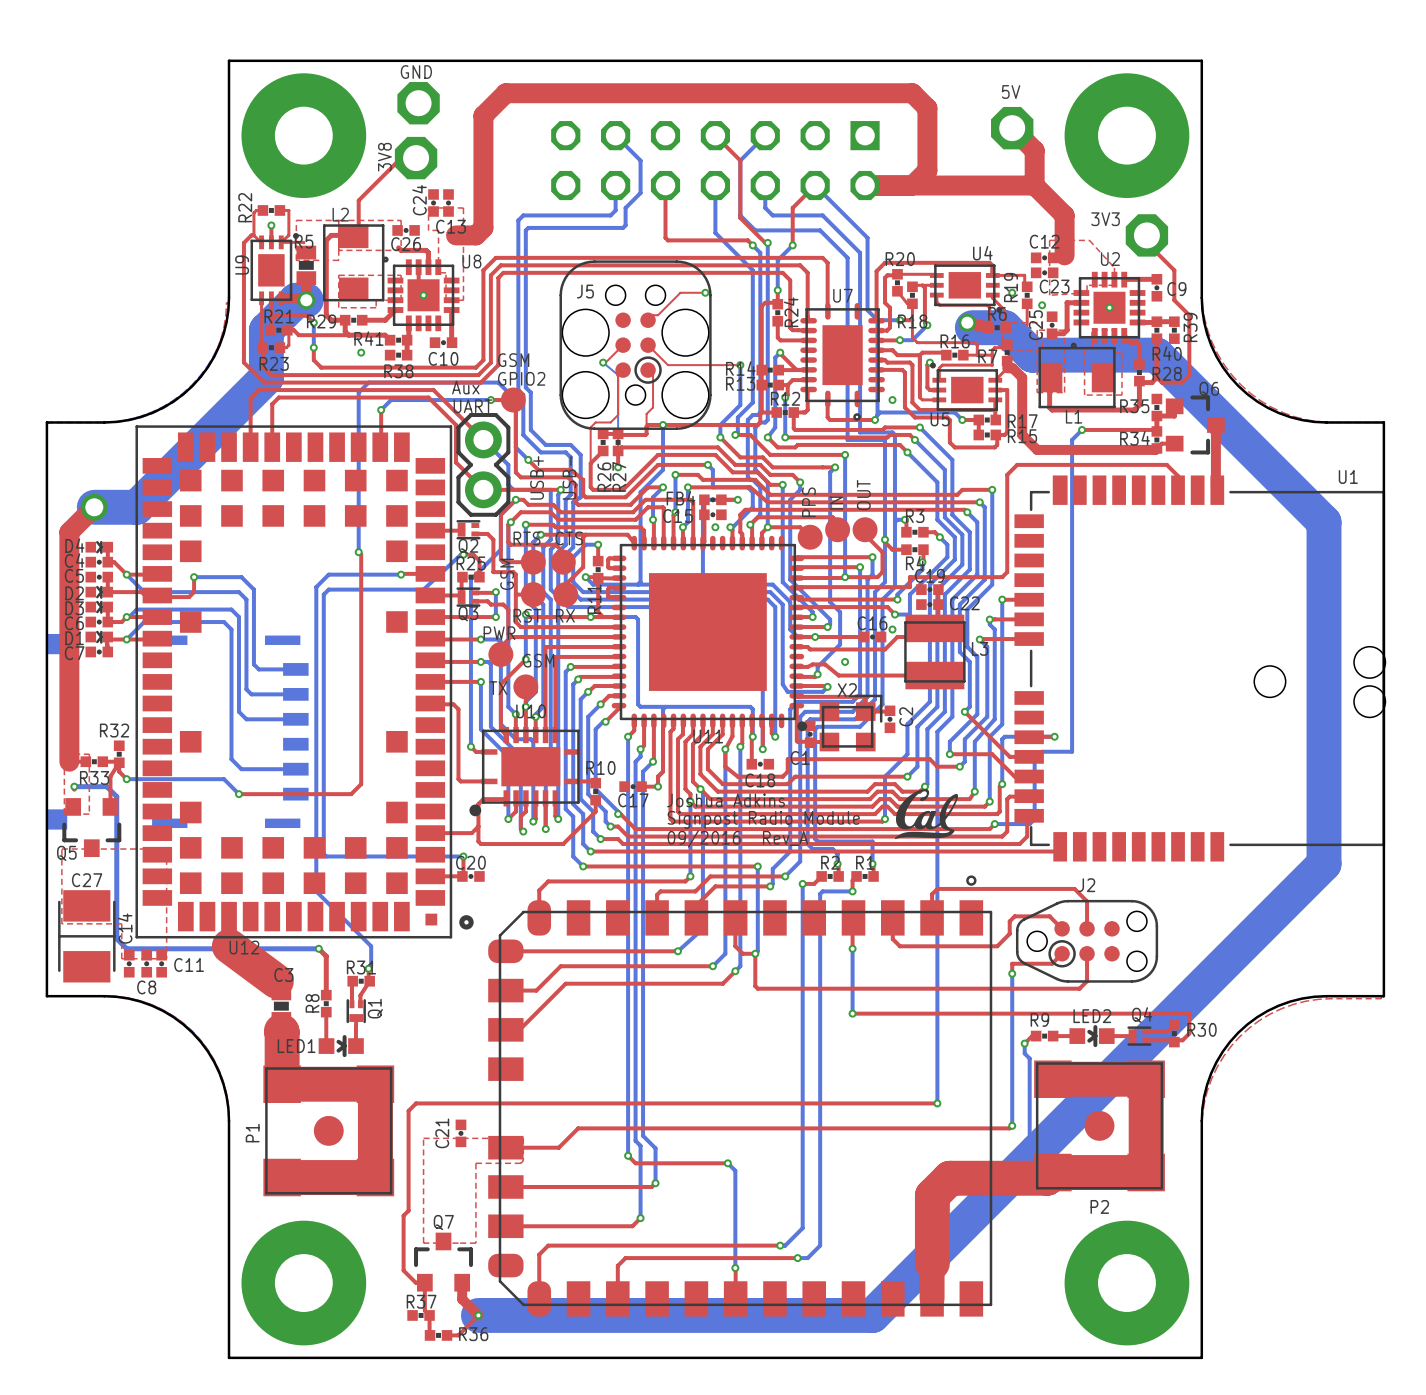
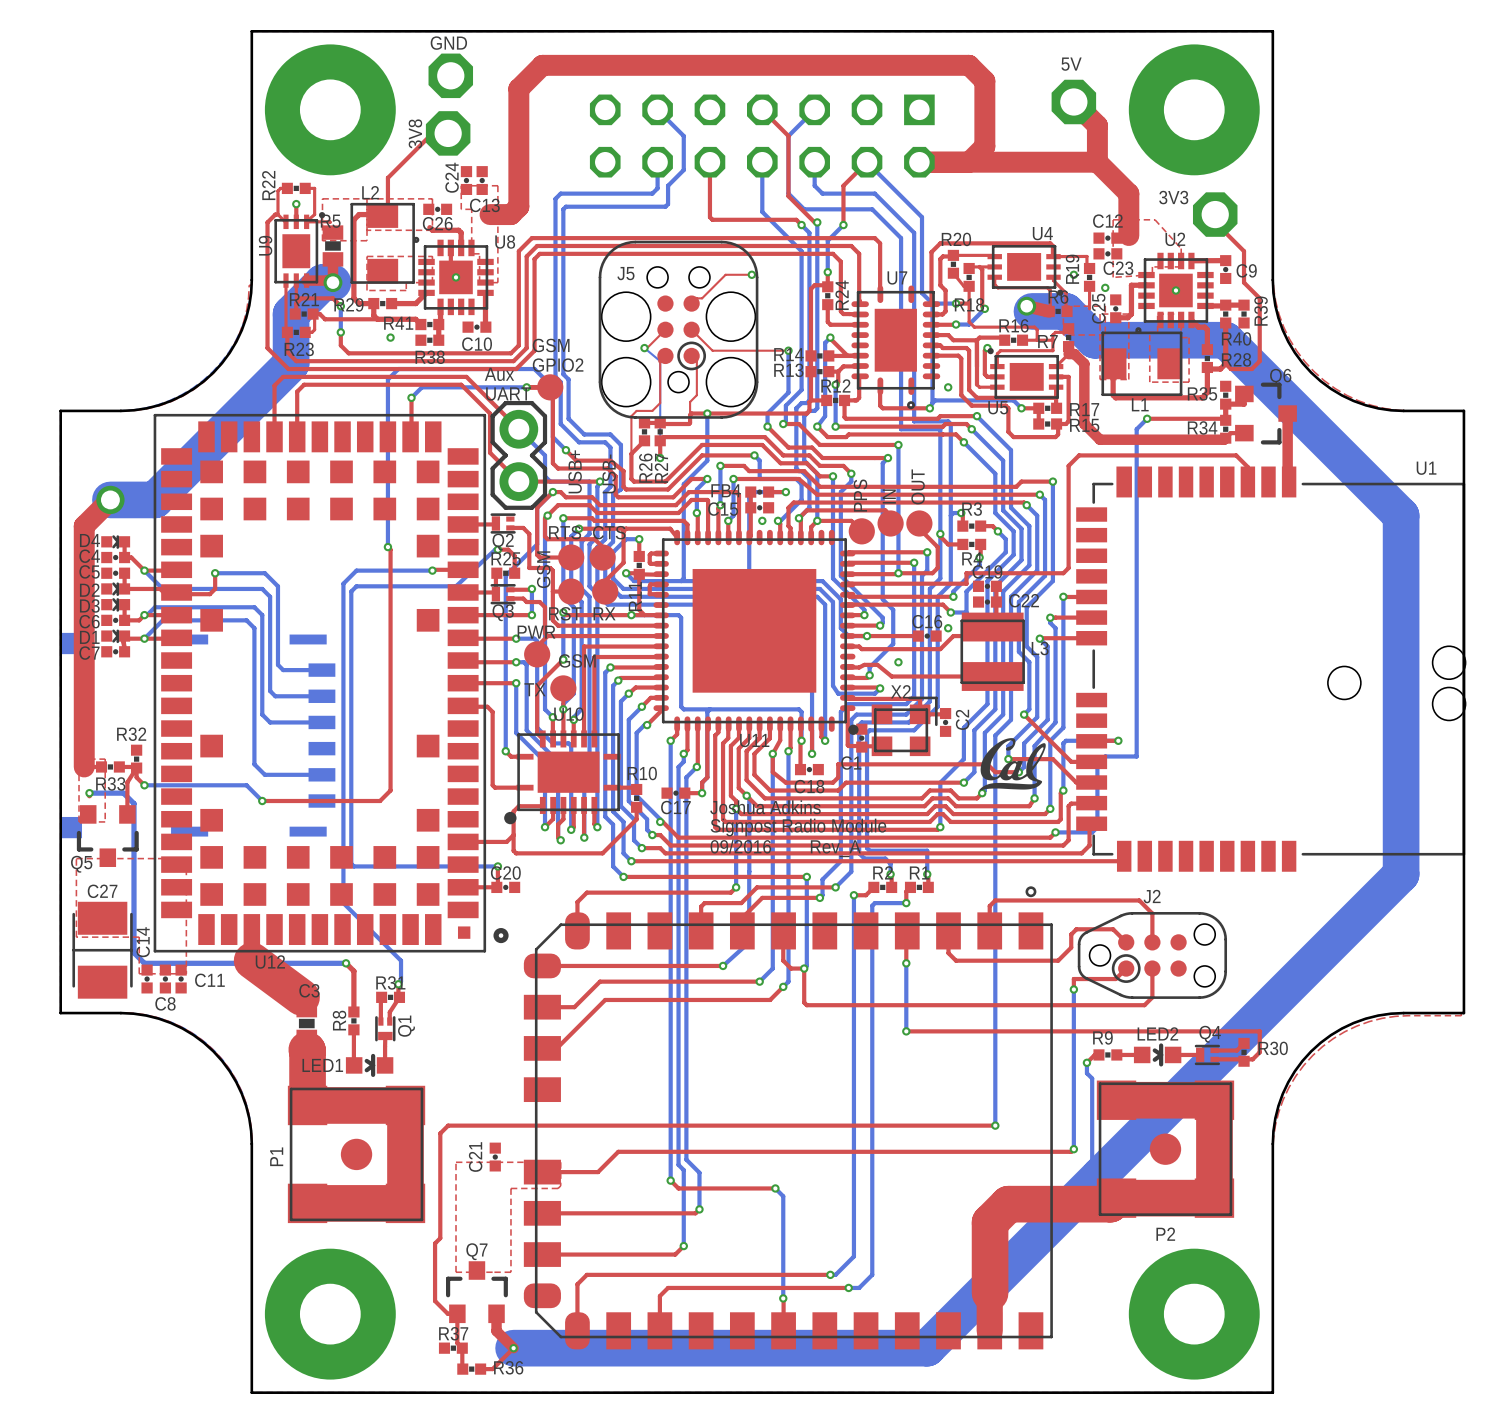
drawing position: (926, 814) -> (1012, 764)

